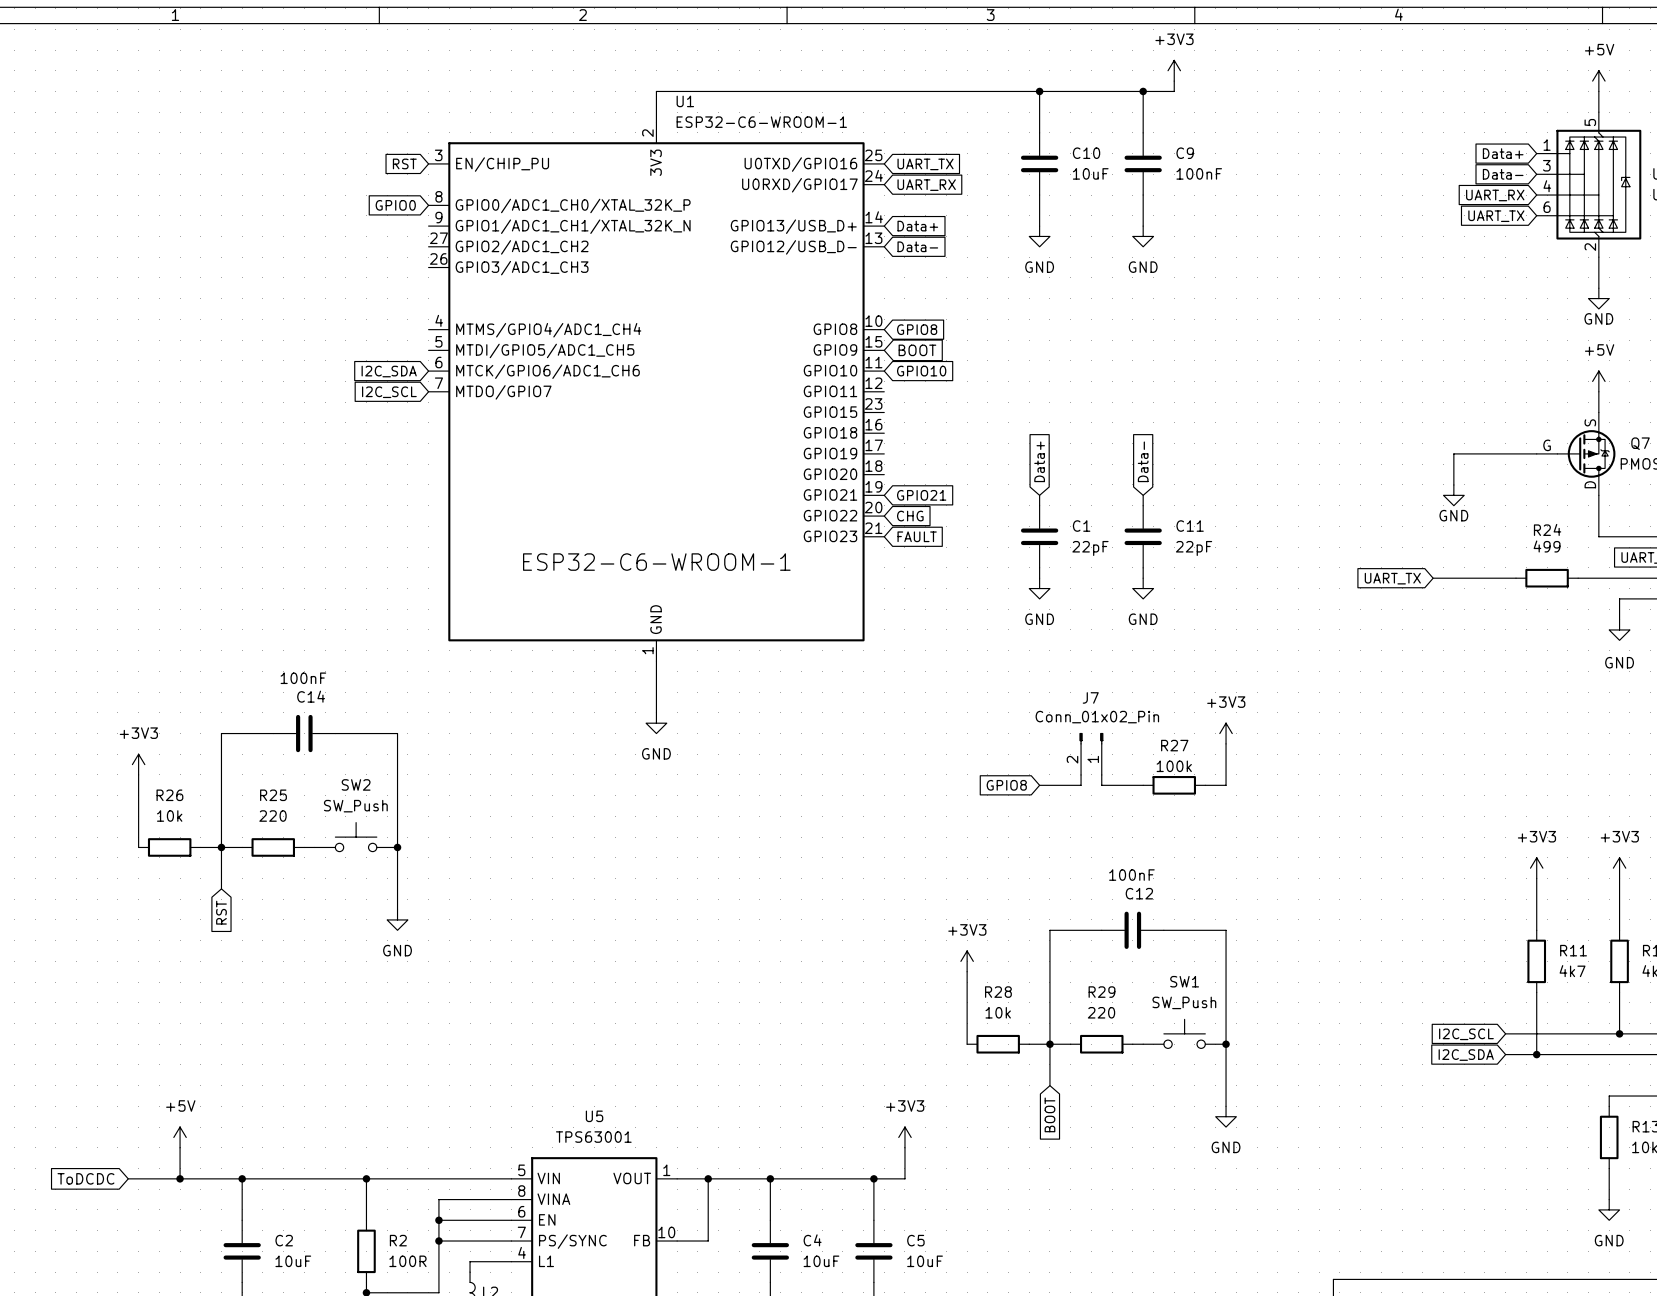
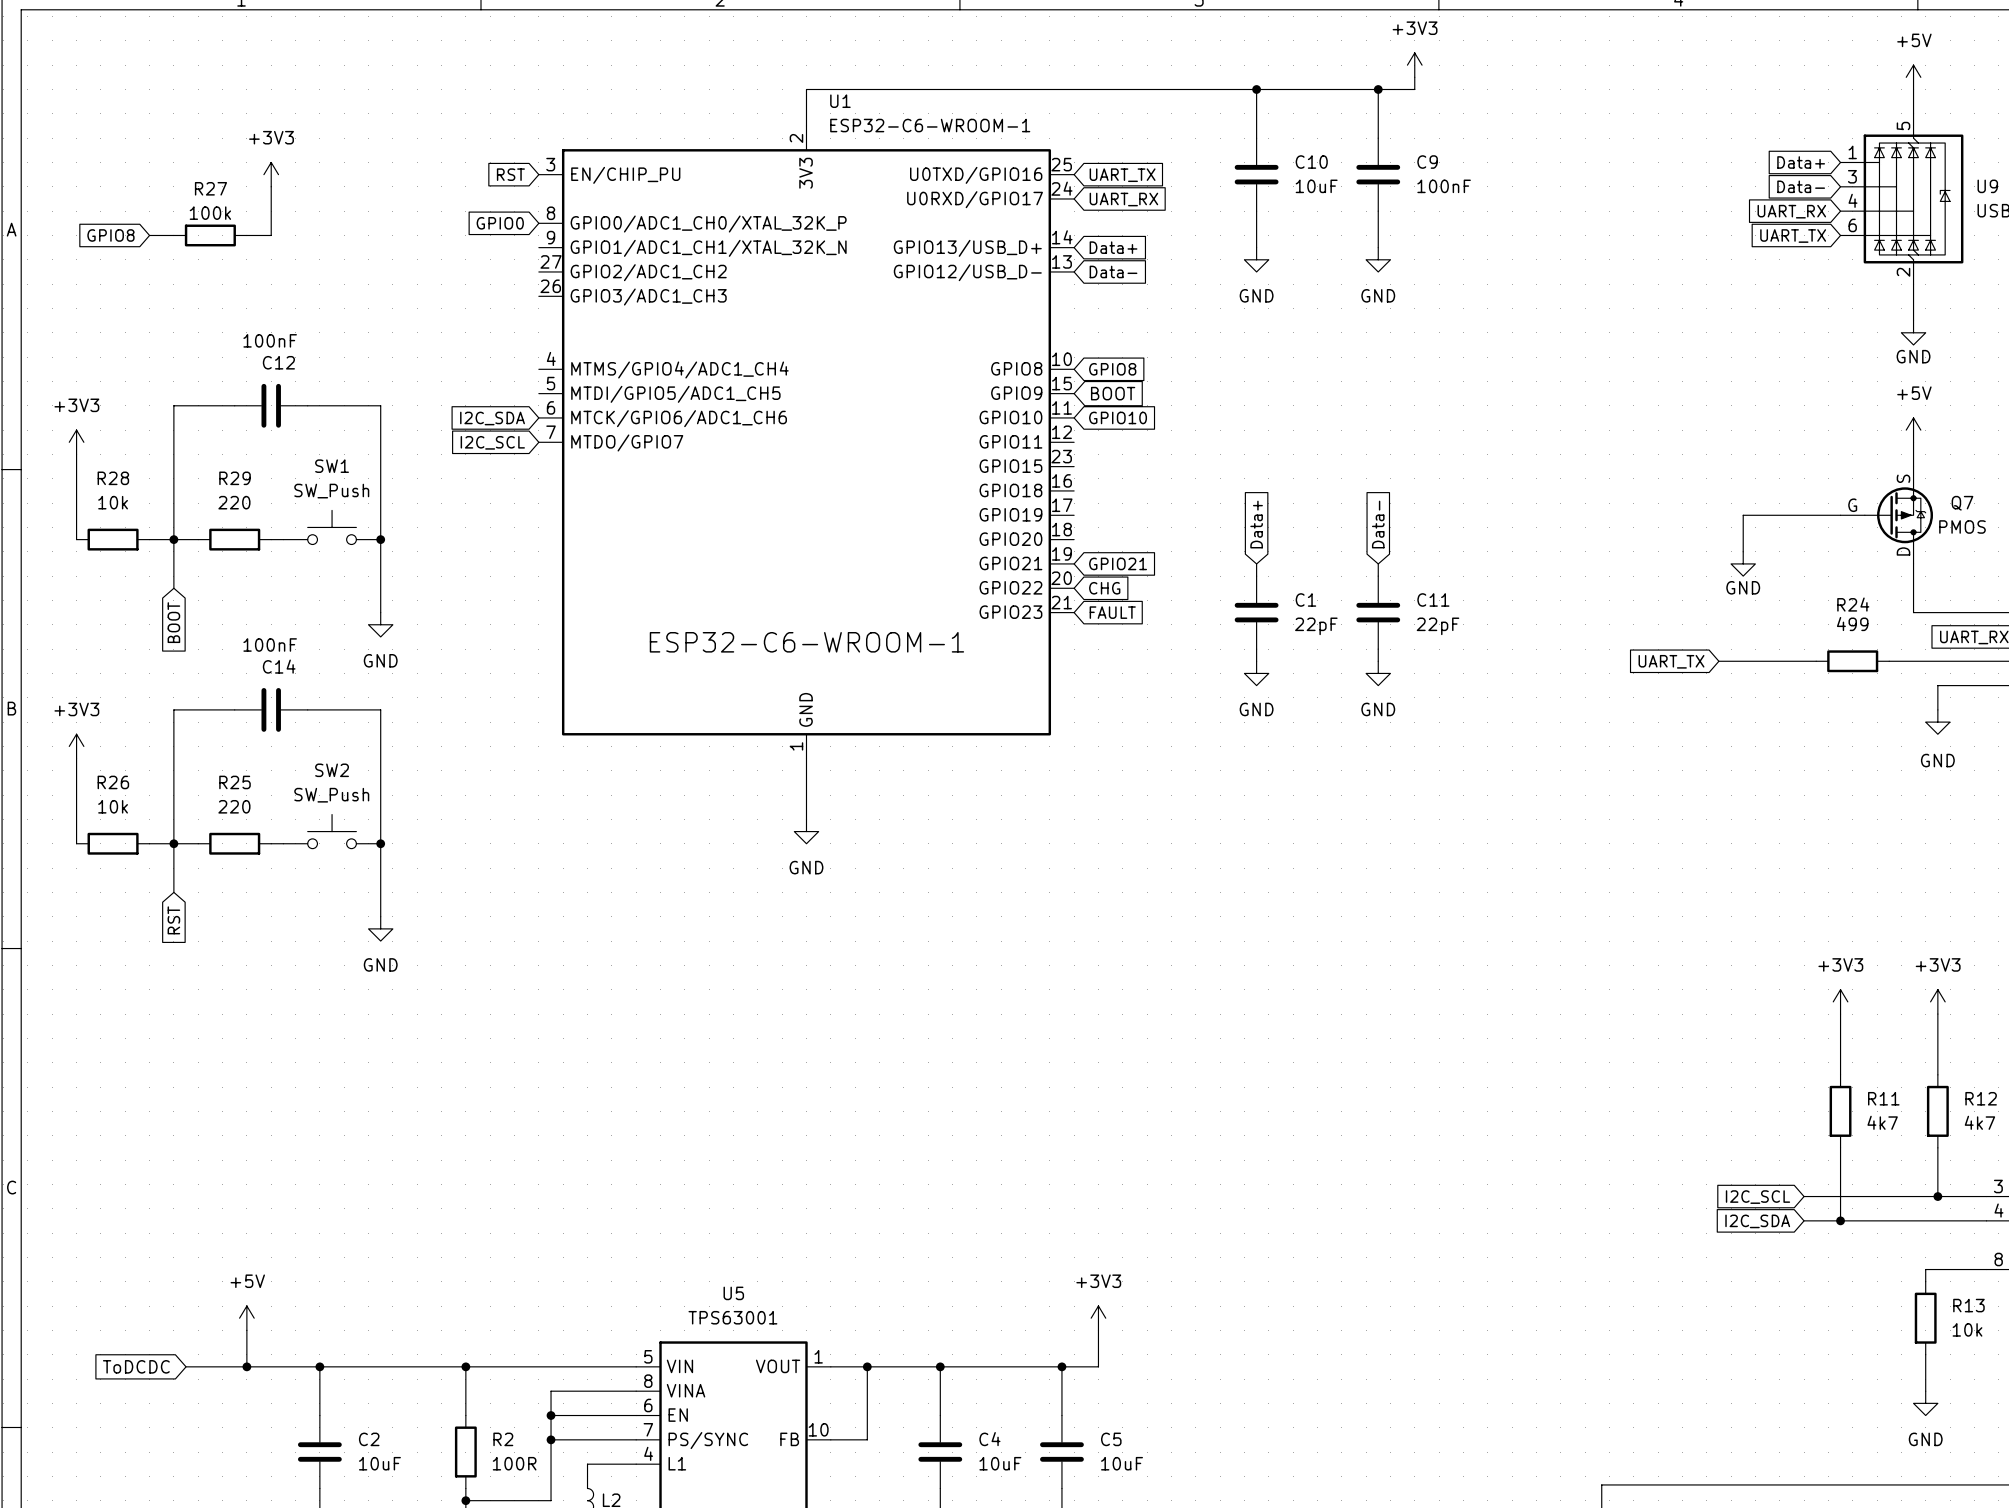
power symbol: none -> +3V3 (271, 174)
wire: none -> (271, 186) (271, 235) (246, 235)
global label: none -> GPIO8 (110, 235)
wire: none -> (149, 235) (173, 235)
wire: none -> (234, 405) (173, 405) (173, 588)
wire: none -> (307, 405) (380, 405) (380, 612)
power symbol: none -> +3V3 (76, 442)
wire: none -> (76, 454) (76, 539)
wire: none -> (149, 539) (198, 539)
junction: none -> (173, 539)
wire: none -> (271, 539) (283, 539)
junction: none -> (380, 539)
global label: none -> BOOT (173, 622)
power symbol: none -> GND (380, 624)
junction: none -> (173, 843)
wire: (273, 733) (221, 733) (221, 888) -> (234, 709) (173, 709) (173, 892)
junction: none -> (380, 843)
C14 position: (304, 733) -> (271, 709)
wire: (335, 733) (397, 733) (397, 909) -> (307, 709) (380, 709) (380, 916)
power symbol: +3V3 (1226, 733) -> none
wire: (1226, 743) (1226, 785) (1205, 785) -> none
J7: Conn_01x02_Pin (1091, 753) -> none
power symbol position: +3V3 (138, 764) -> +3V3 (76, 746)
wire: (138, 774) (138, 847) -> (76, 758) (76, 843)
wire: (1081, 774) (1081, 785) (1039, 785) -> none
wire: (1101, 774) (1101, 785) (1143, 785) -> none
global label: GPIO8 (1006, 785) -> none
R27 position: (1174, 785) -> (210, 235)
SW2 position: (356, 837) -> (332, 831)
R26 position: (169, 847) -> (113, 843)
wire: (200, 847) (242, 847) -> (149, 843) (198, 843)
junction: (221, 847) -> none
R25 position: (273, 847) -> (234, 843)
wire: (304, 847) (314, 847) -> (271, 843) (283, 843)
junction: (397, 847) -> none
global label position: RST (221, 912) -> RST (173, 920)
power symbol position: GND (397, 919) -> GND (380, 928)
wire: (1101, 930) (1049, 930) (1049, 1085) -> none
C12 position: (1132, 930) -> (271, 405)
wire: (1163, 930) (1226, 930) (1226, 1106) -> none
power symbol: +3V3 (967, 961) -> none
wire: (967, 971) (967, 1044) -> none
SW1 position: (1184, 1033) -> (332, 527)
R28 position: (998, 1044) -> (113, 539)
wire: (1029, 1044) (1070, 1044) -> none
junction: (1049, 1044) -> none
R29 position: (1101, 1044) -> (234, 539)
wire: (1132, 1044) (1143, 1044) -> none
junction: (1226, 1044) -> none
global label: BOOT (1049, 1114) -> none
power symbol: GND (1226, 1116) -> none

